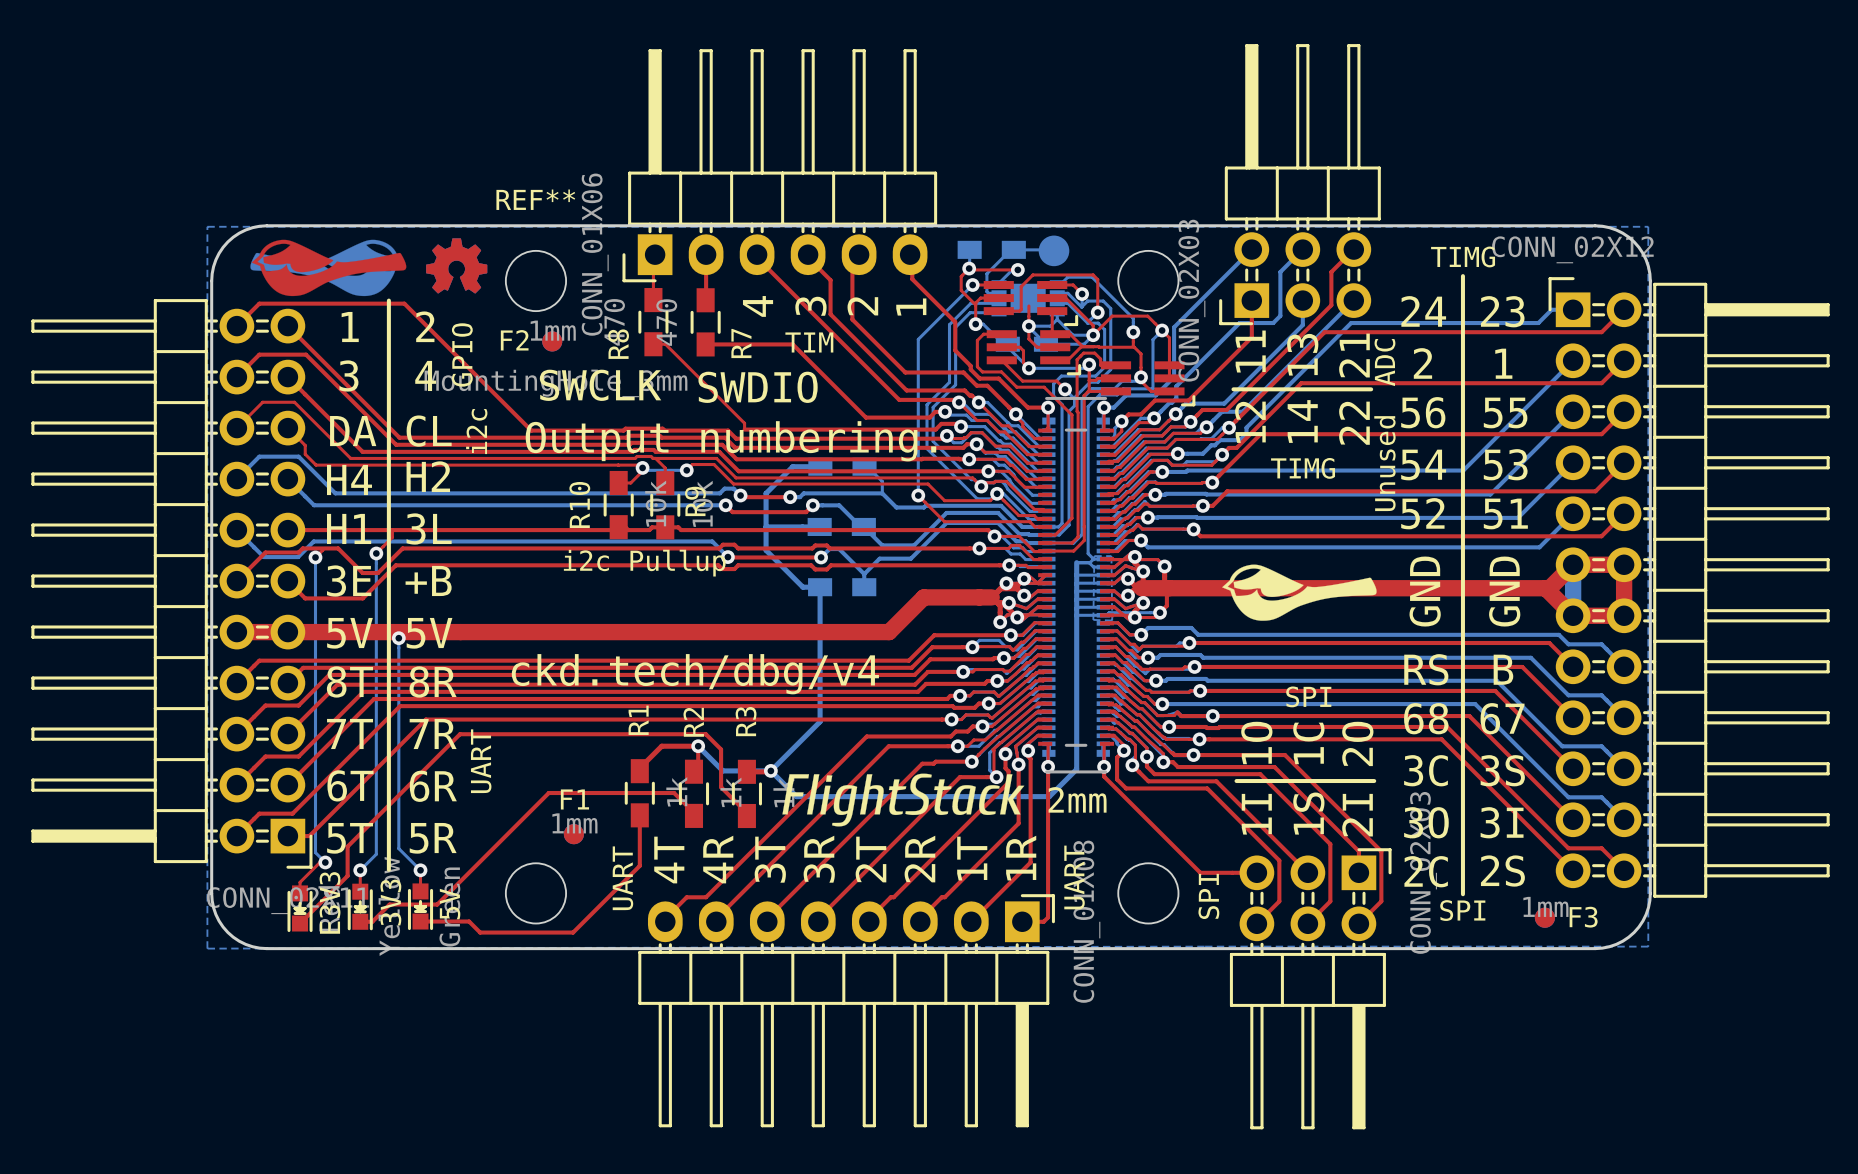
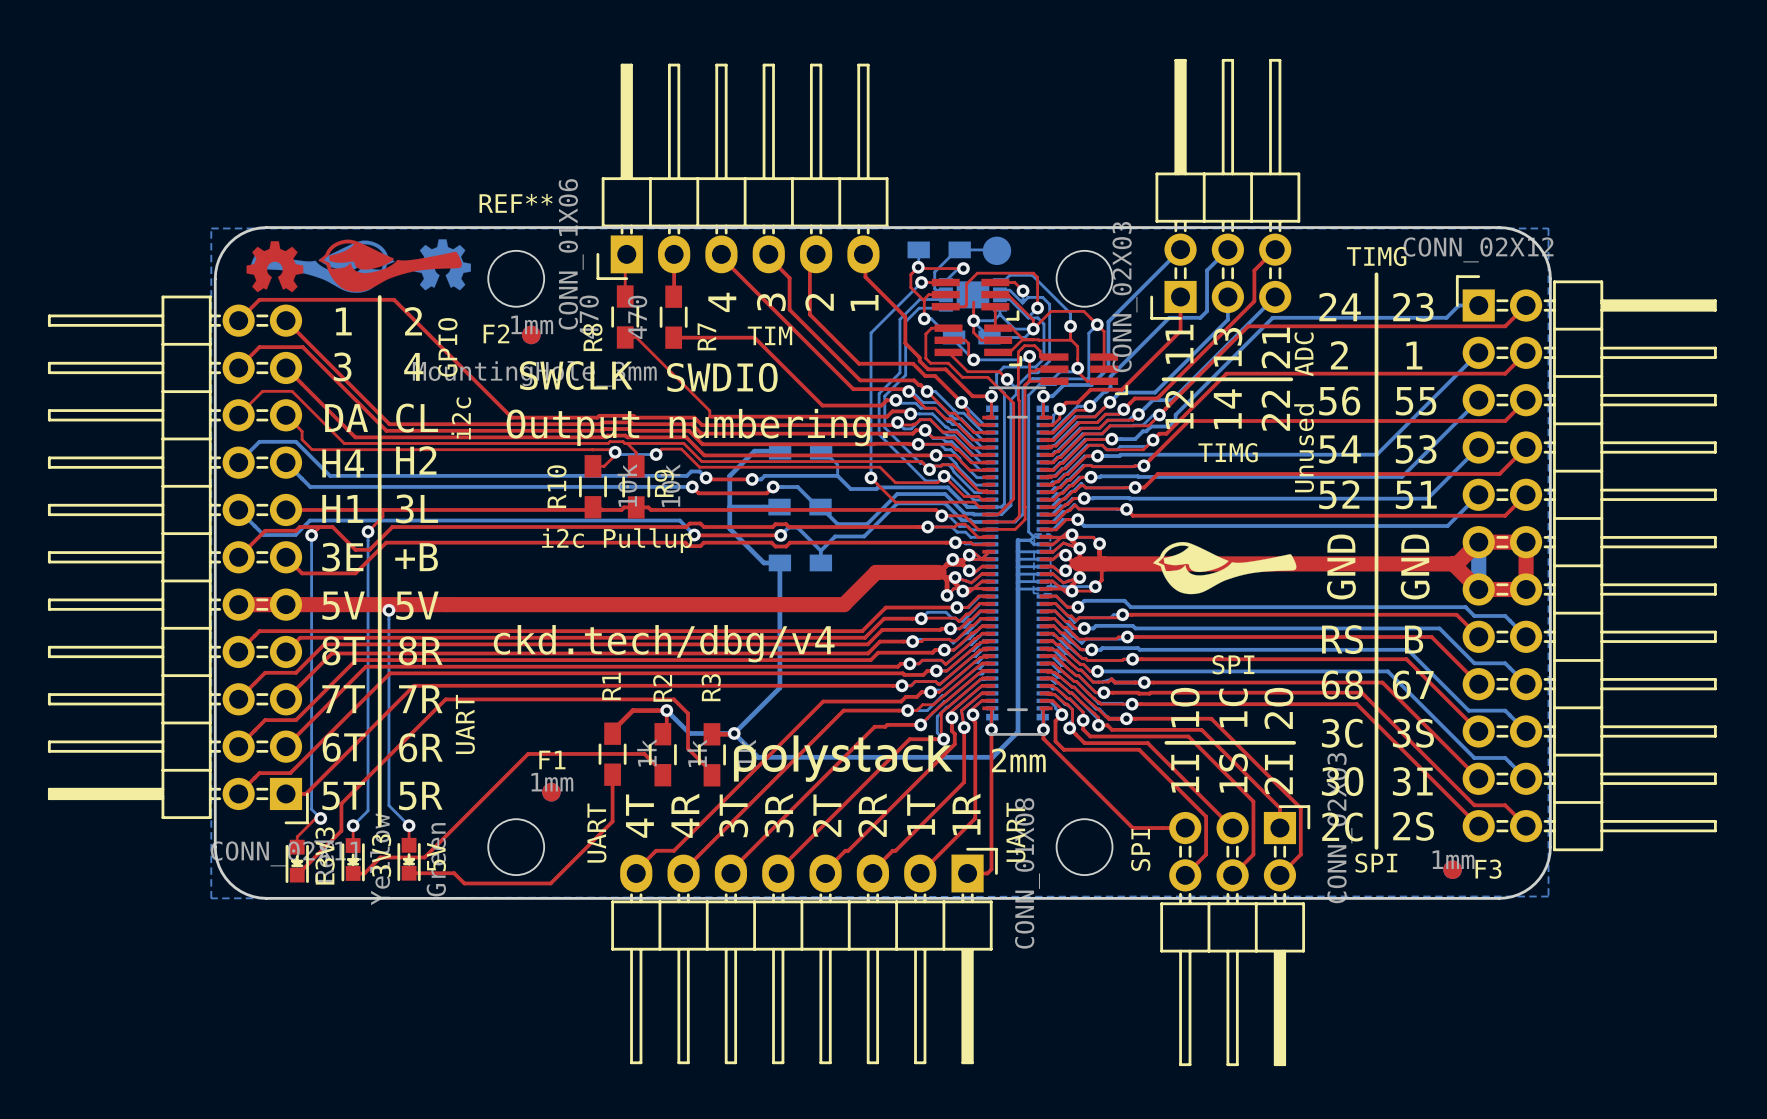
drawing position: (456, 265) -> (274, 266)
drawing position: (329, 267) -> (390, 265)
drawing shape: [782, 773, 1025, 827] -> [733, 735, 953, 782]

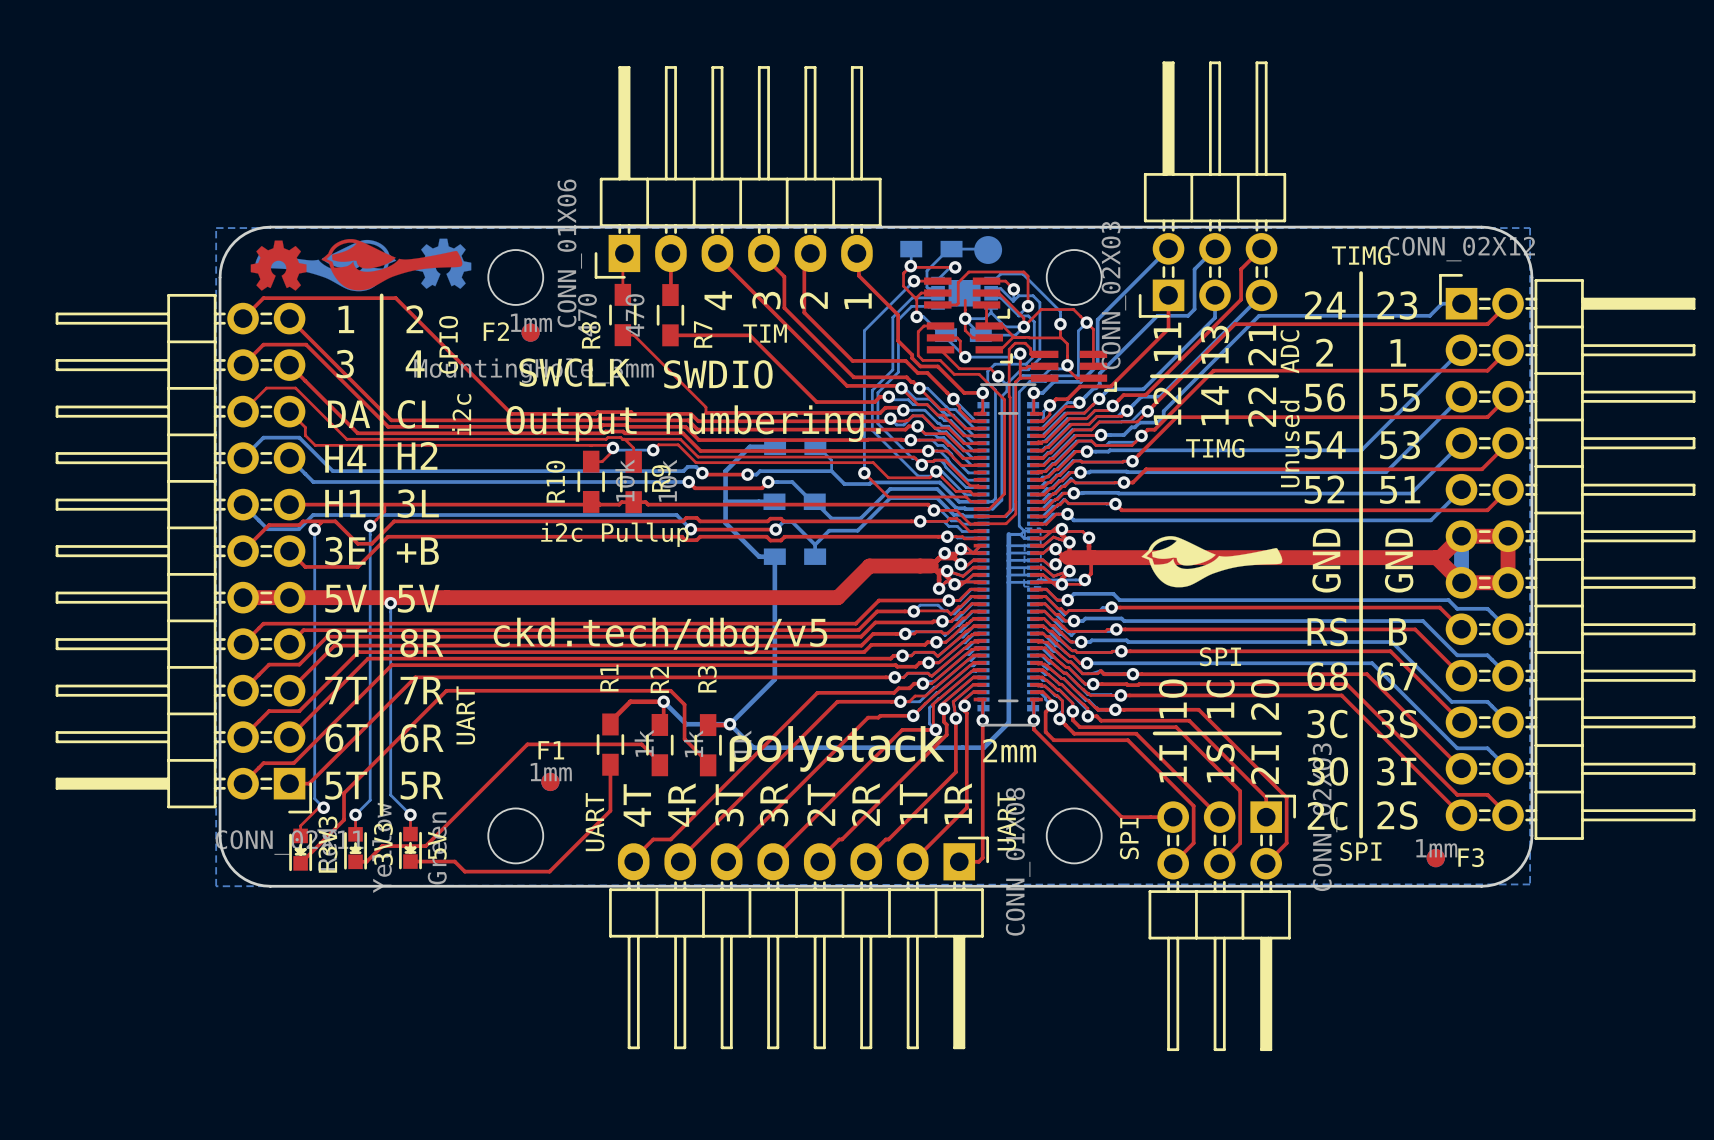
REF** name: REF** (516, 203) -> none
text: ckd.tech/dbg/v4 (664, 643) -> ckd.tech/dbg/v5 (660, 636)

